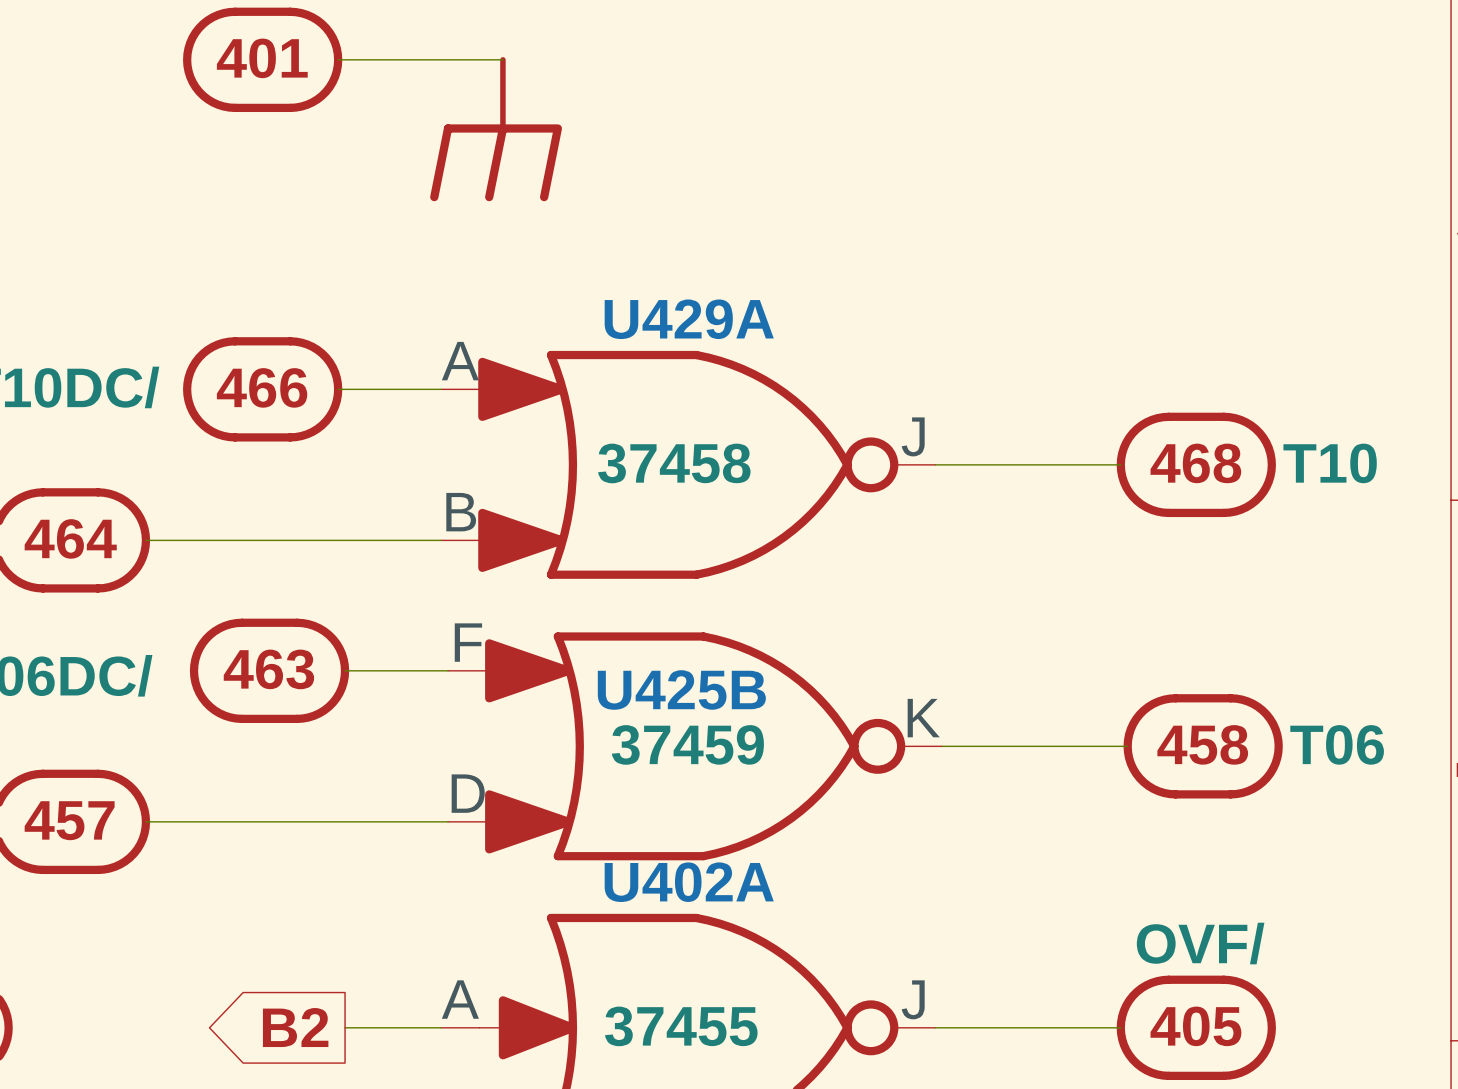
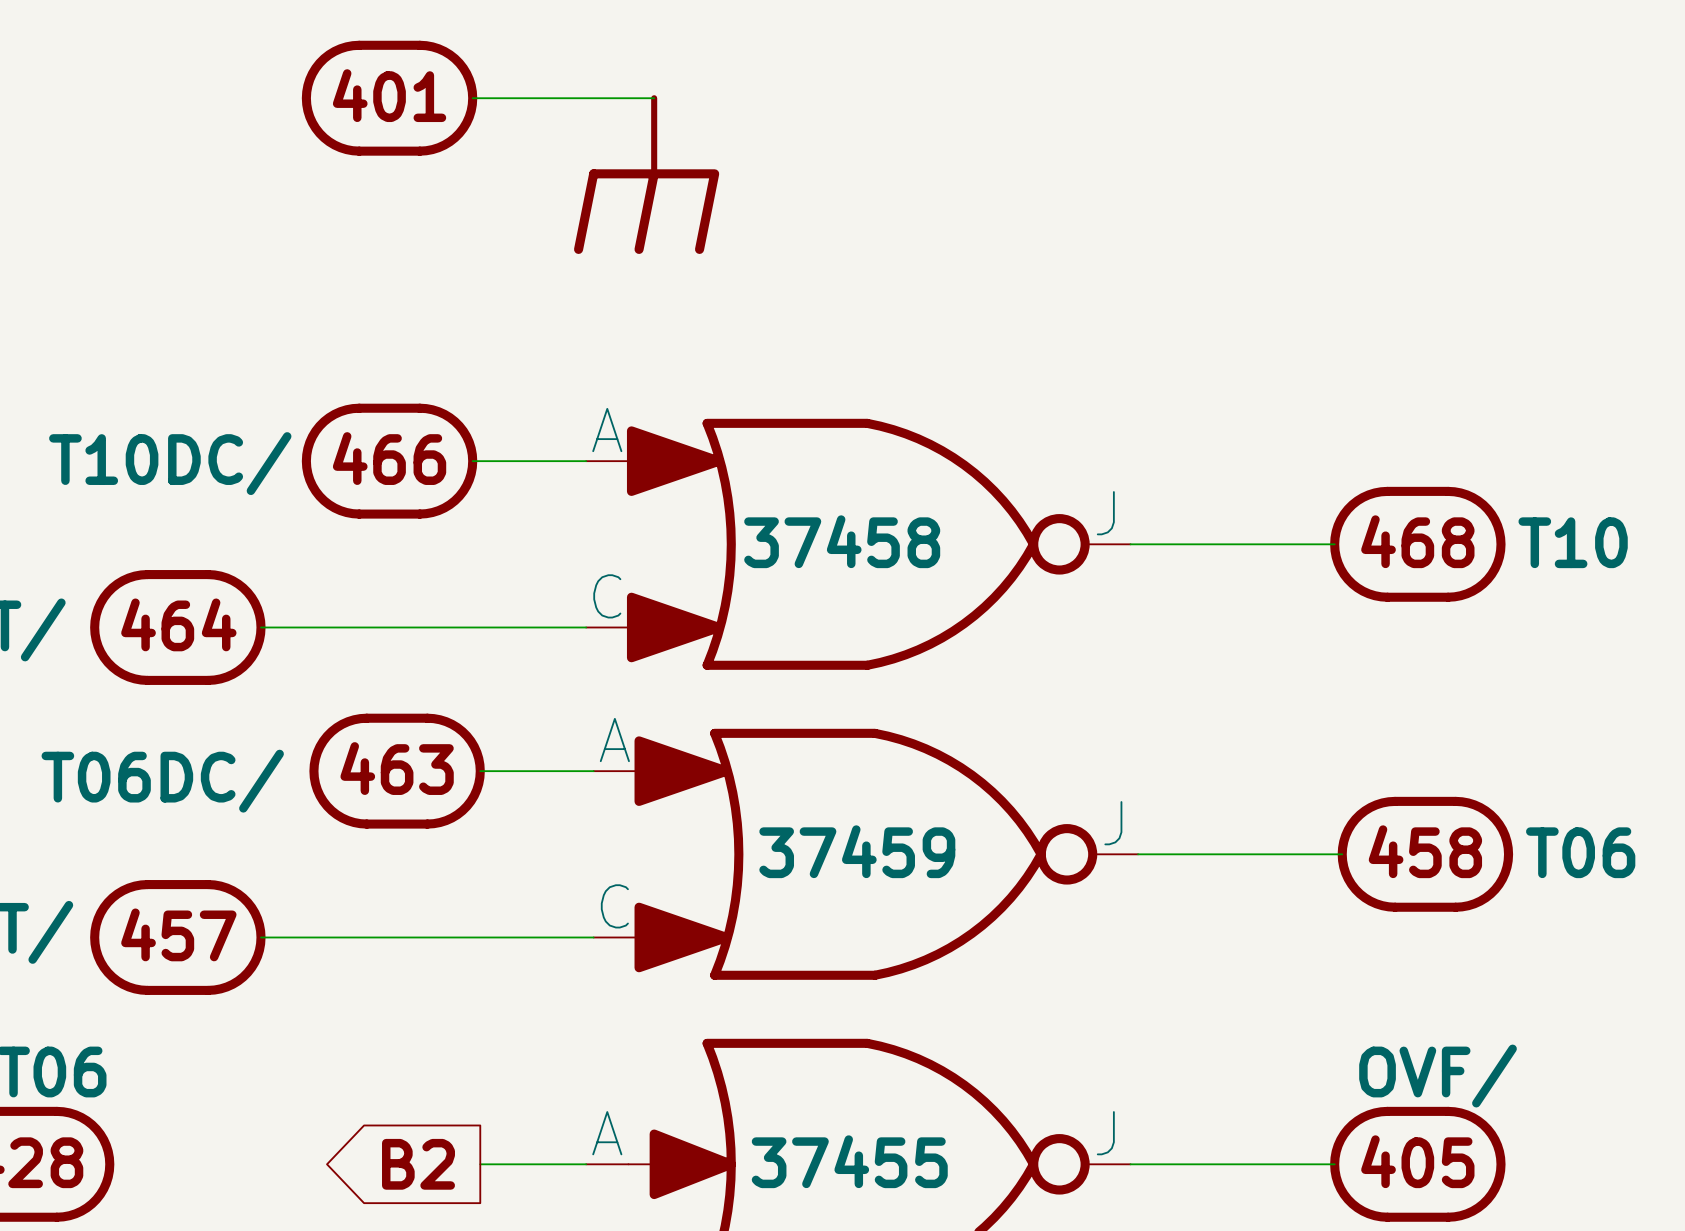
U429A name: U429A (689, 319) -> none
U429A pin name: B (461, 512) -> C (607, 596)
U425B pin name: F (468, 642) -> A (614, 740)
U425B name: U425B (681, 689) -> none
U425B pin name: K (923, 718) -> J (1113, 823)
U425B pin name: D (468, 793) -> C (614, 906)
U402A name: U402A (689, 882) -> none

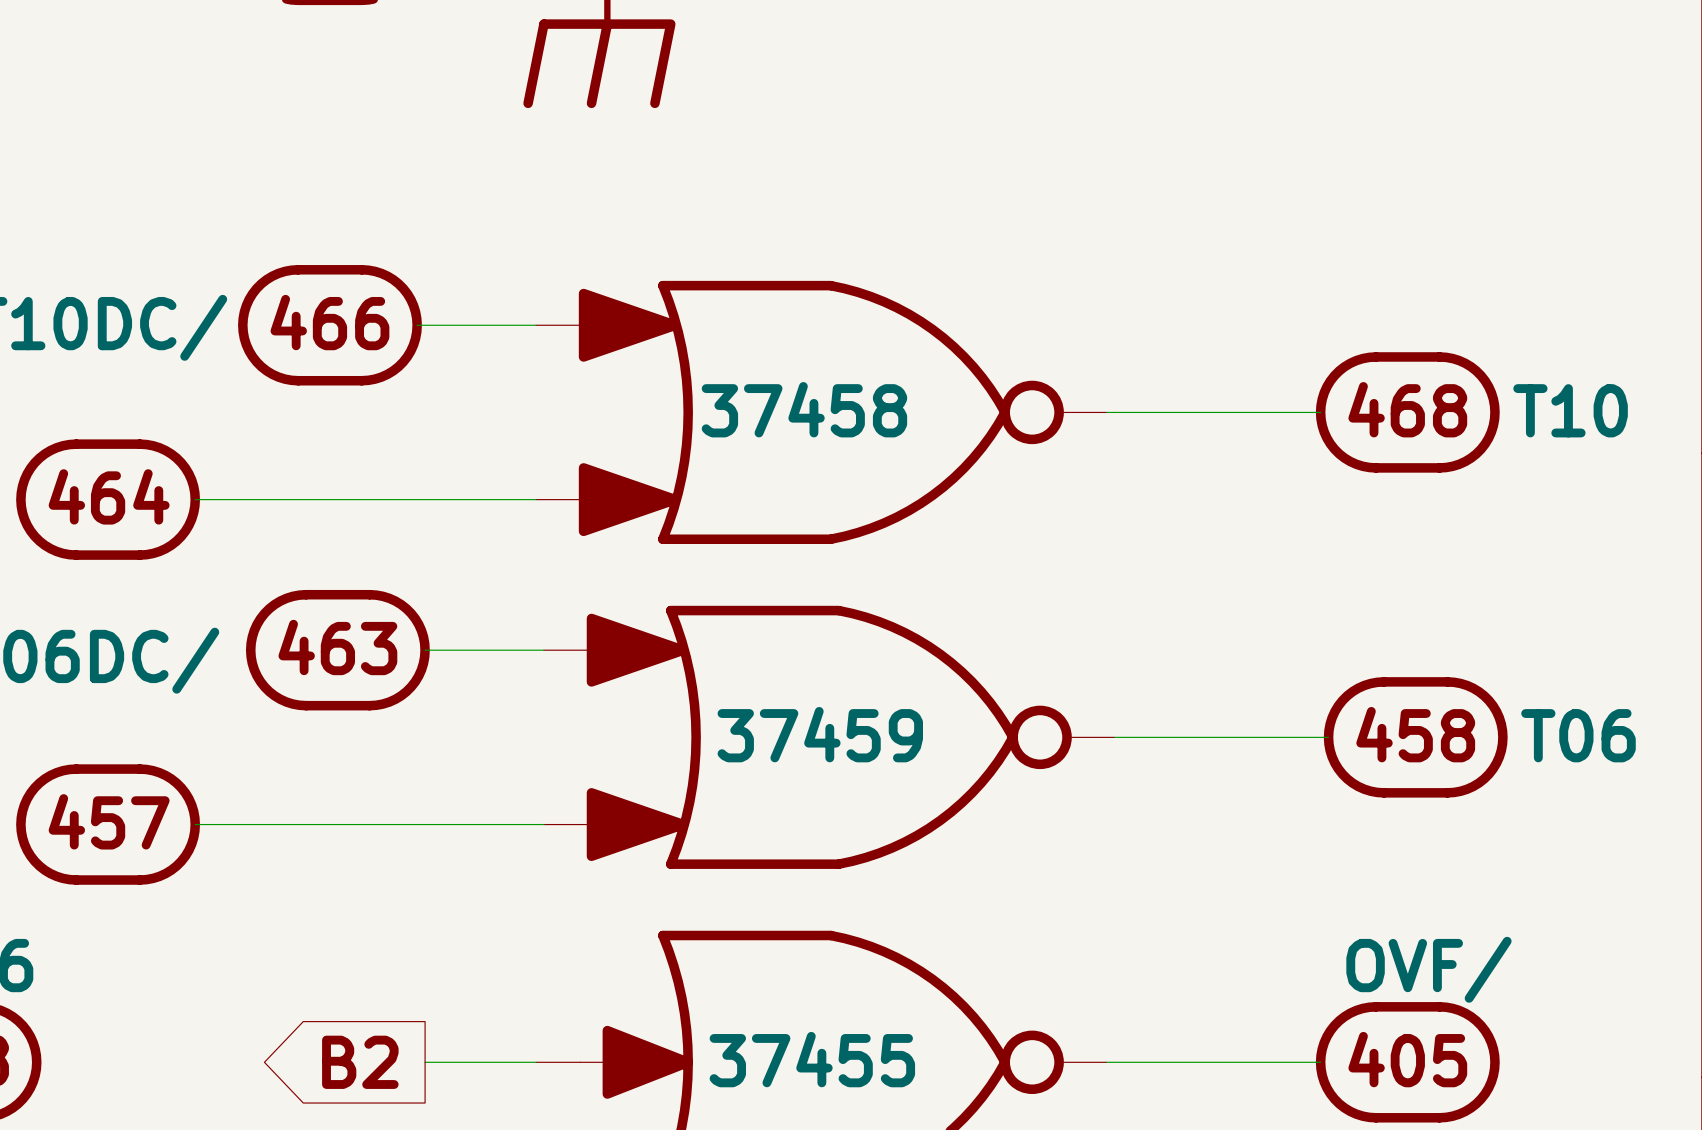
part pin name: A (607, 430) -> none
part pin name: J (1105, 513) -> none
part pin name: C (607, 596) -> none
part pin name: A (614, 740) -> none
part pin name: J (1113, 823) -> none
part pin name: C (614, 906) -> none
part pin name: A (607, 1133) -> none
part pin name: J (1105, 1133) -> none

